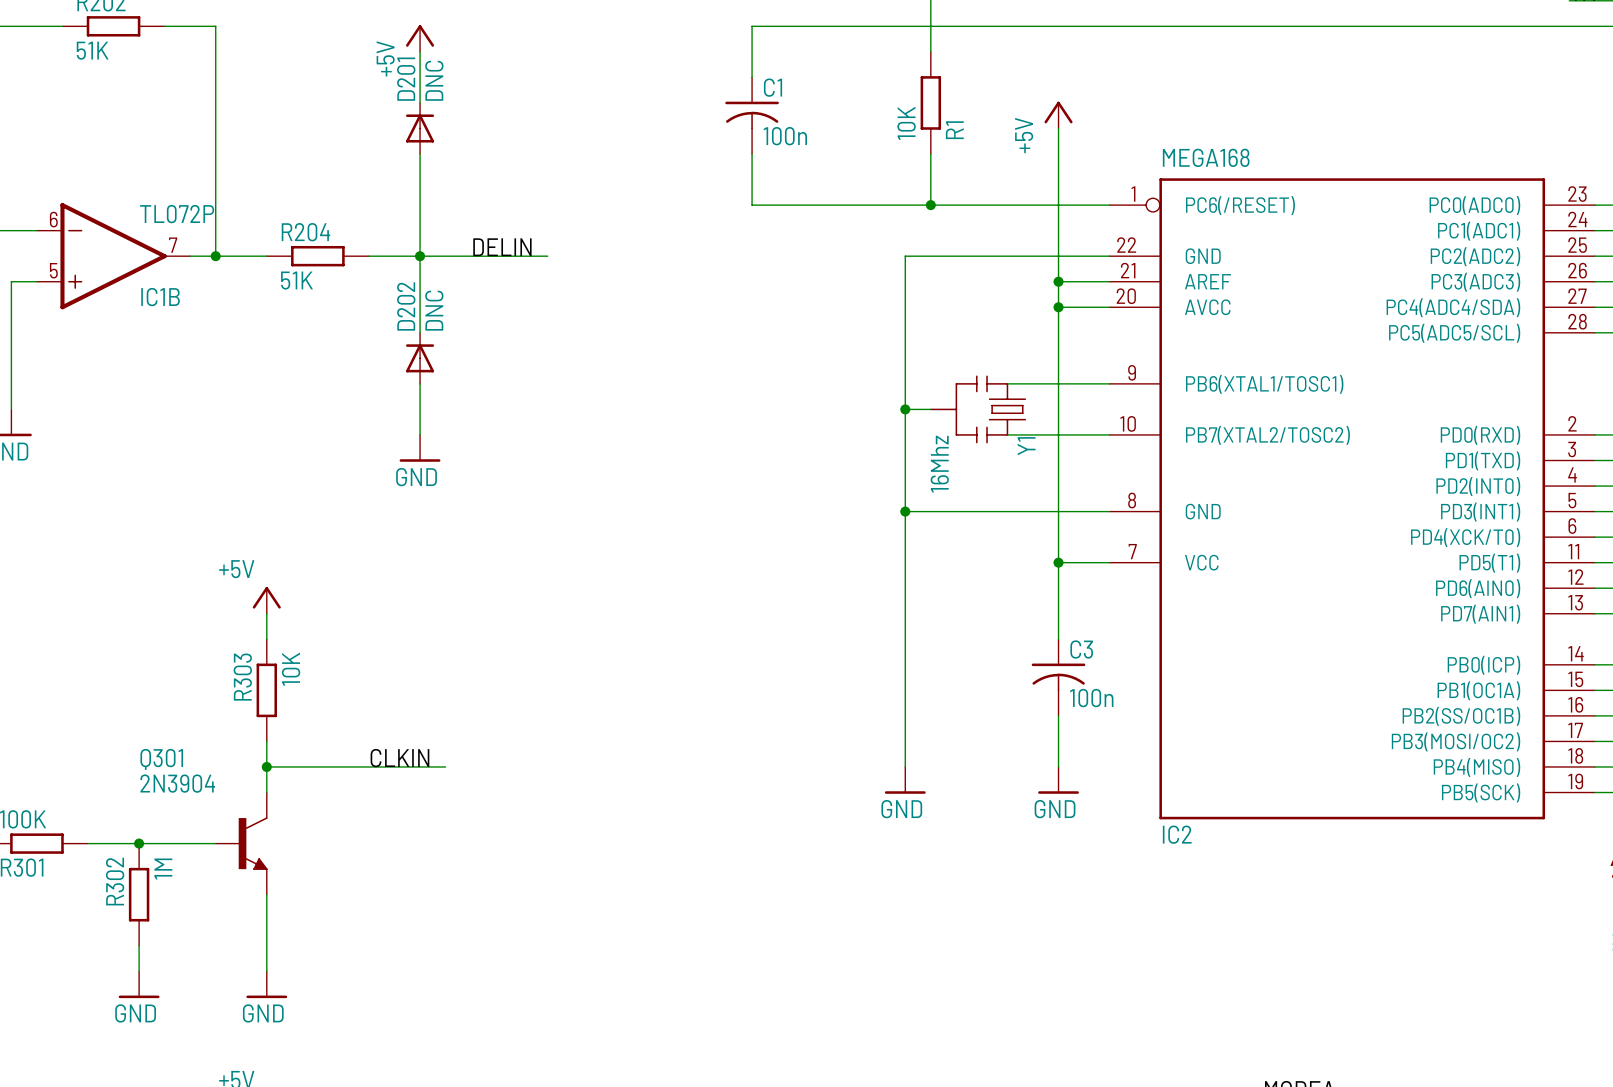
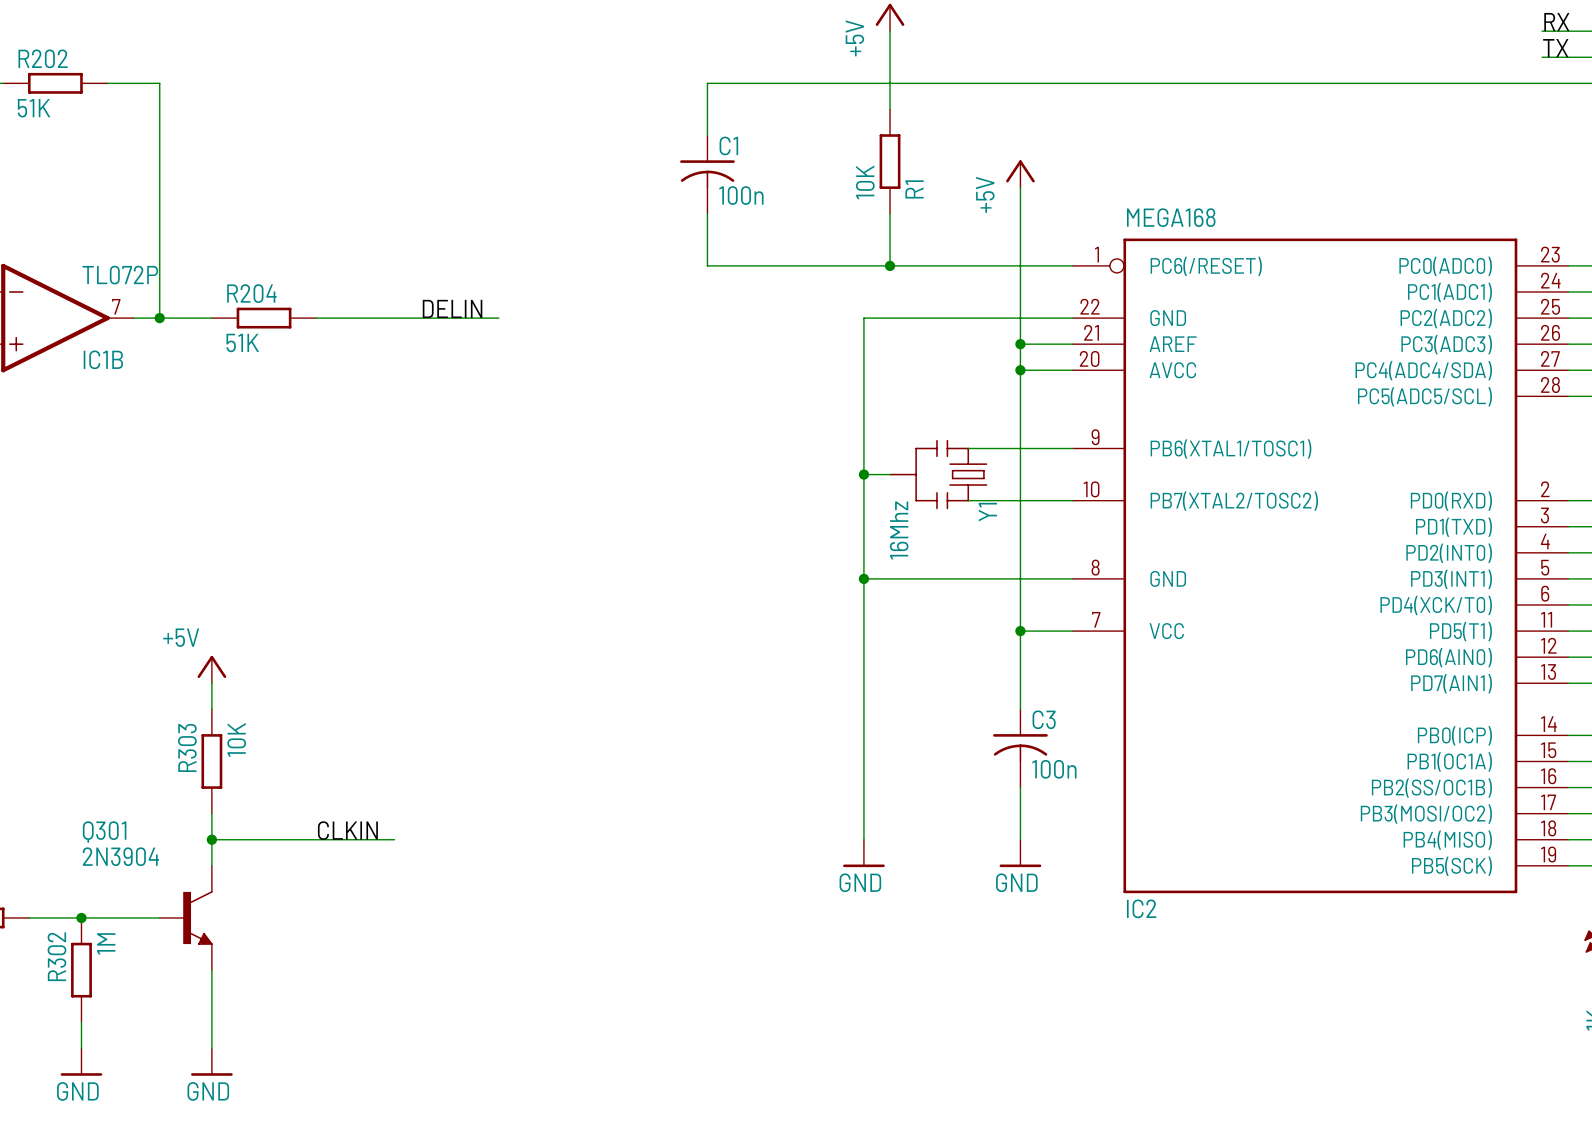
power symbol: +5V (420, 38) -> none
wire: (420, 51) (420, 102) -> none
D201: DNC (420, 128) -> none
wire: (420, 154) (420, 332) -> none
junction: (420, 256) -> none
D202: DNC (420, 358) -> none
wire: (420, 383) (420, 434) -> none
power symbol: GND (420, 448) -> none

